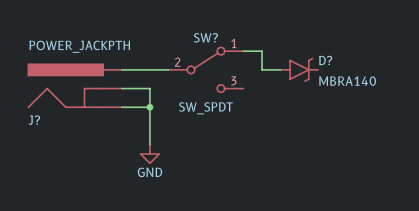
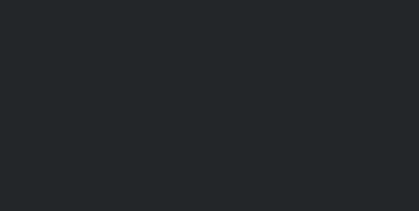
wire: (243, 51) (262, 51) (262, 69) (280, 69) -> none
wire: (121, 69) (168, 69) -> none
SW?: SW_SPDT (205, 69) -> none
D?: MBRA140 (299, 69) -> none
J?: POWER_JACKPTH (75, 85) -> none
wire: (121, 88) (149, 88) (149, 144) -> none
wire: (121, 107) (149, 107) -> none
junction: (149, 107) -> none
power symbol: GND (149, 153) -> none

